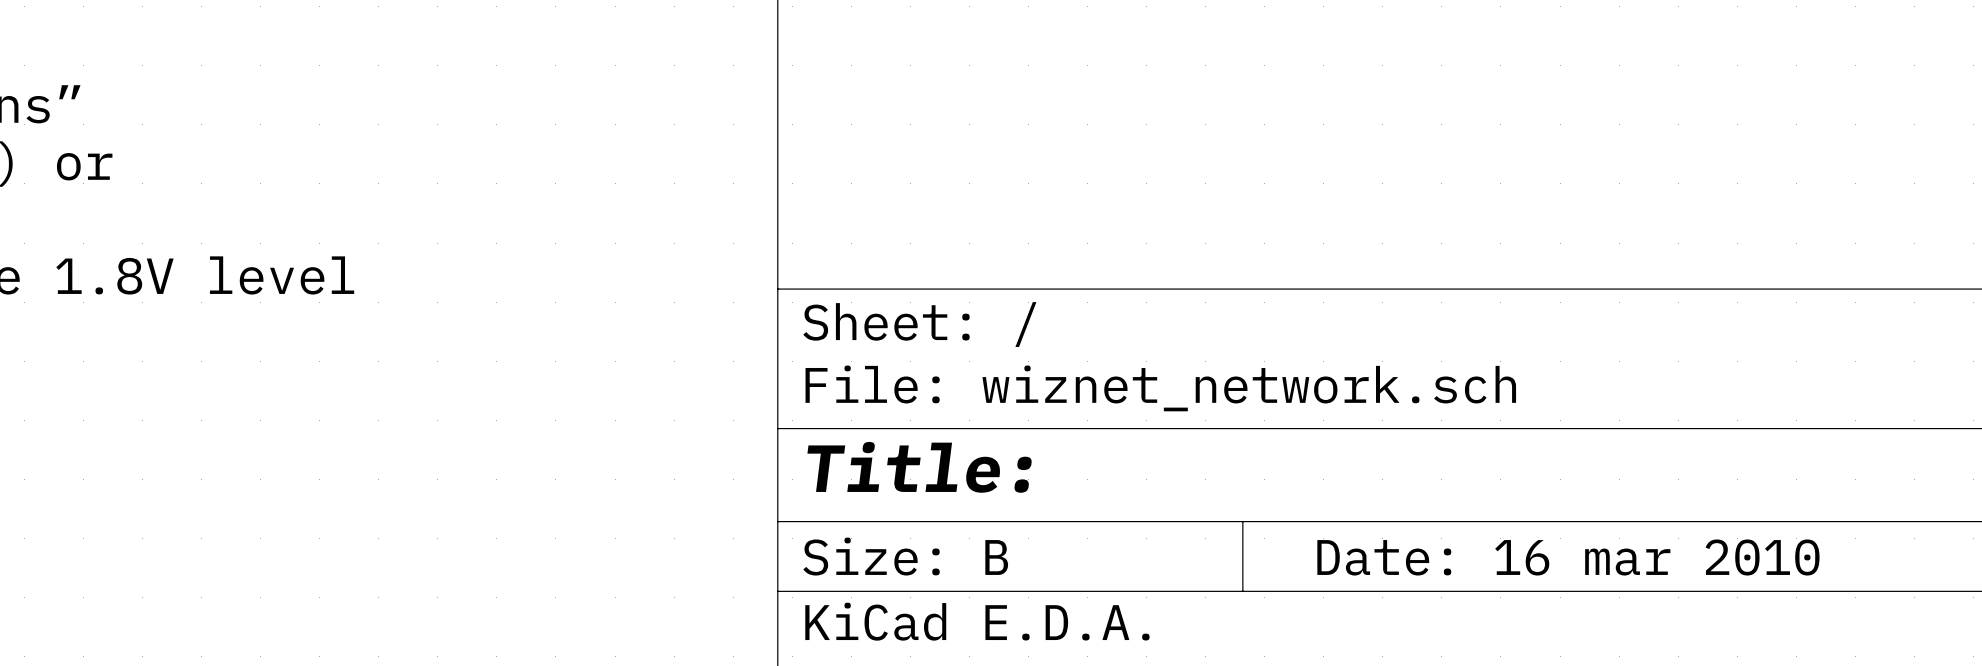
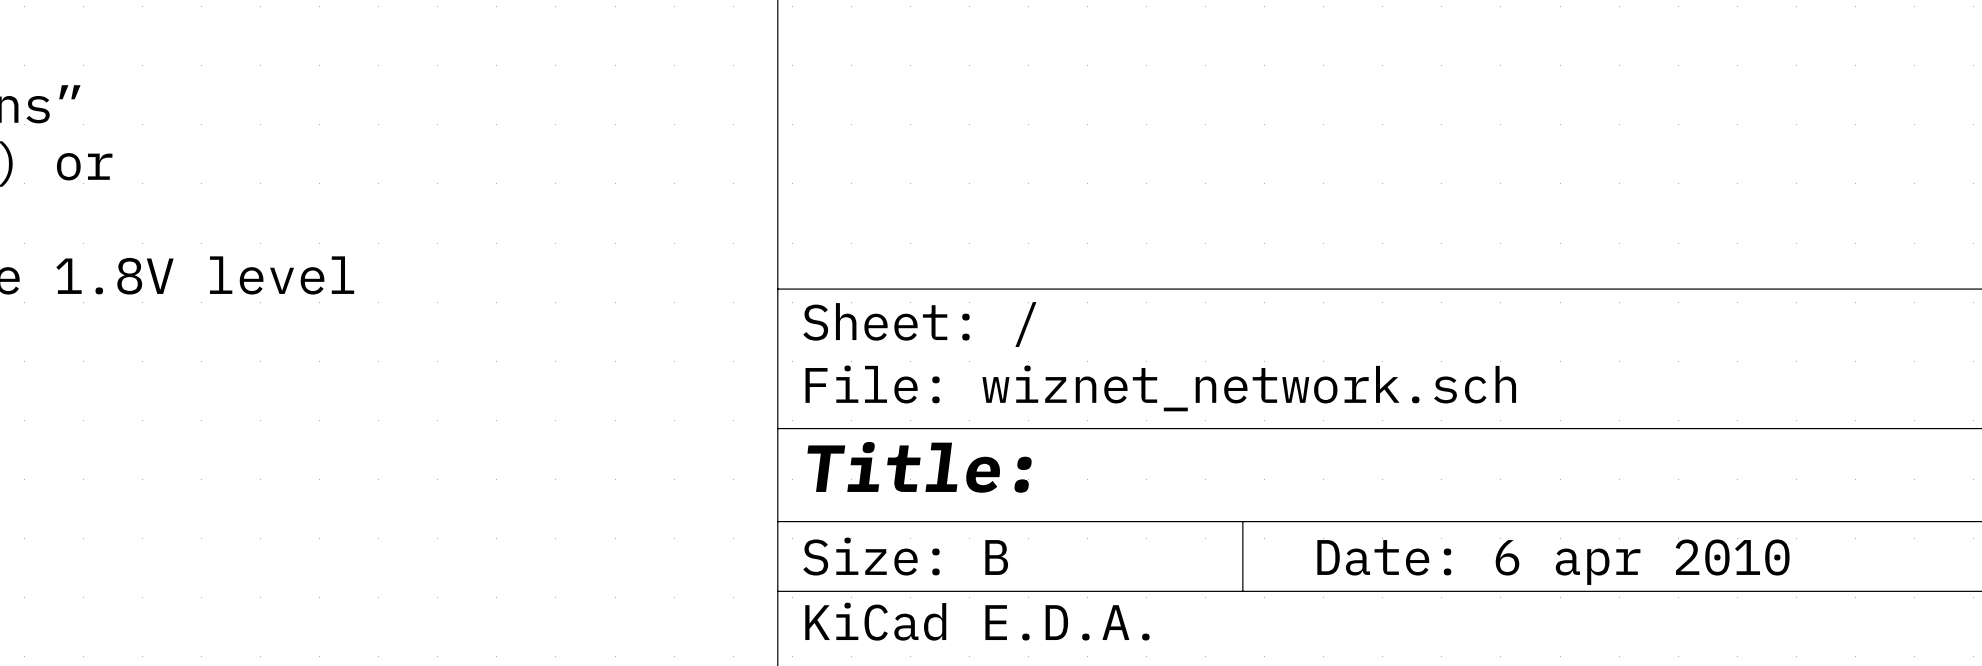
title block: Date: 16 mar 2010 (1568, 557) -> Date: 6 apr 2010 (1553, 562)

